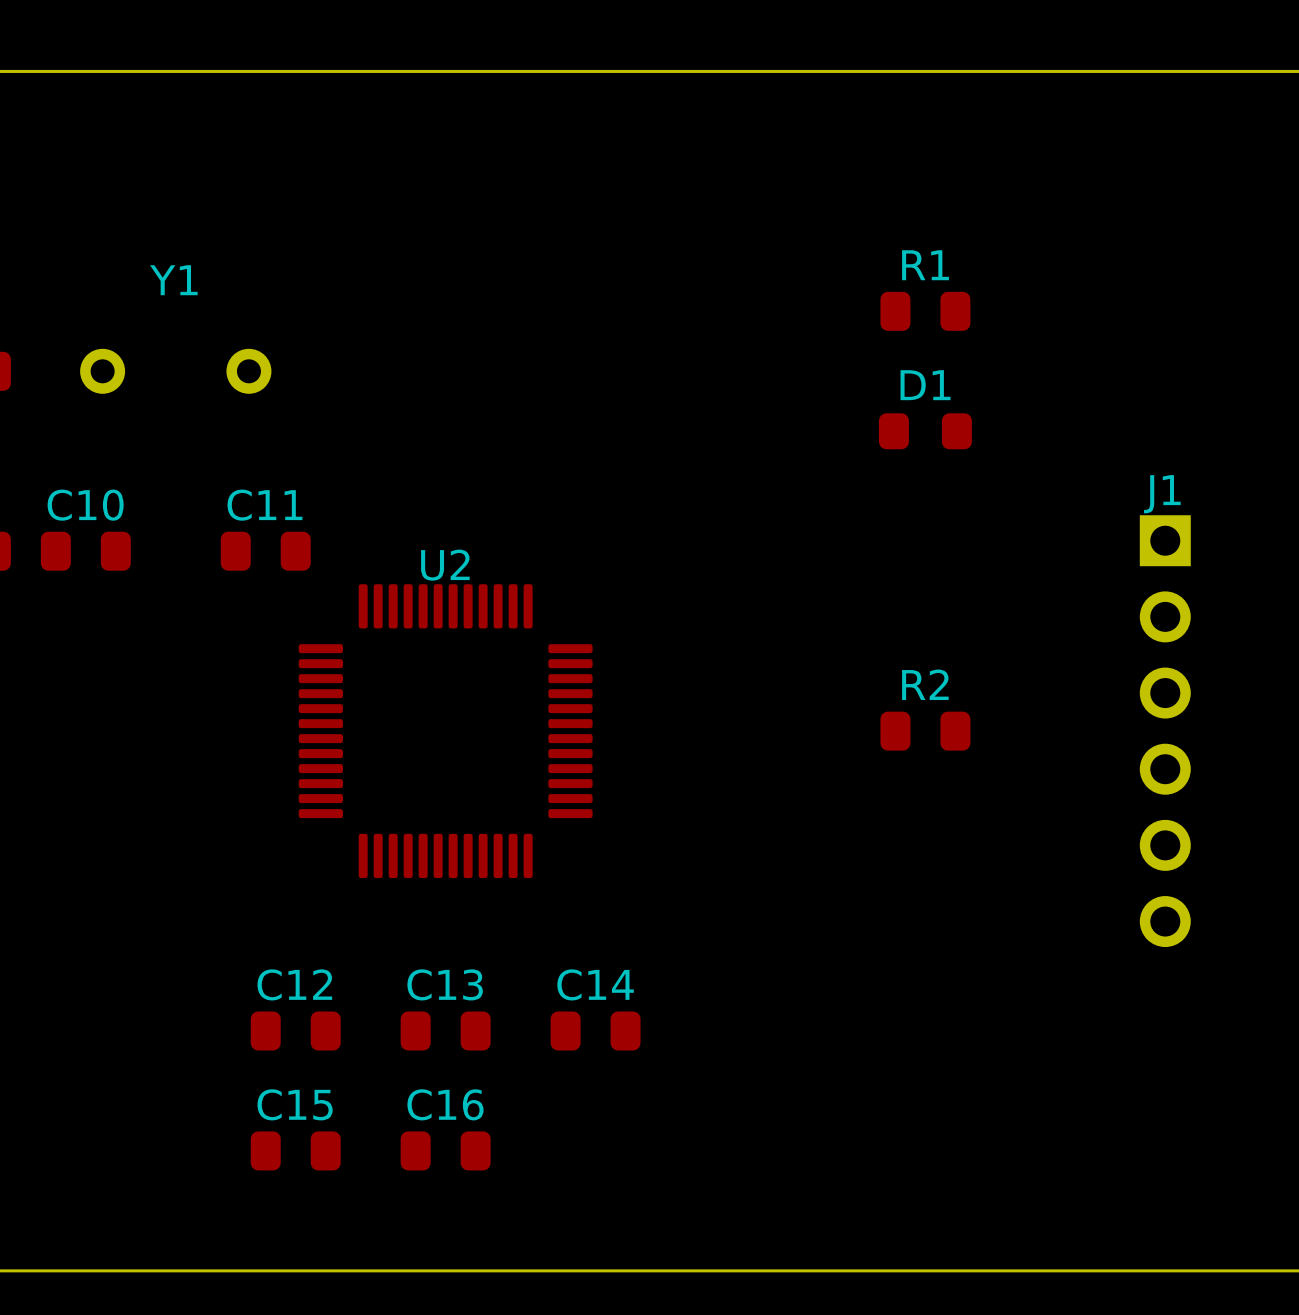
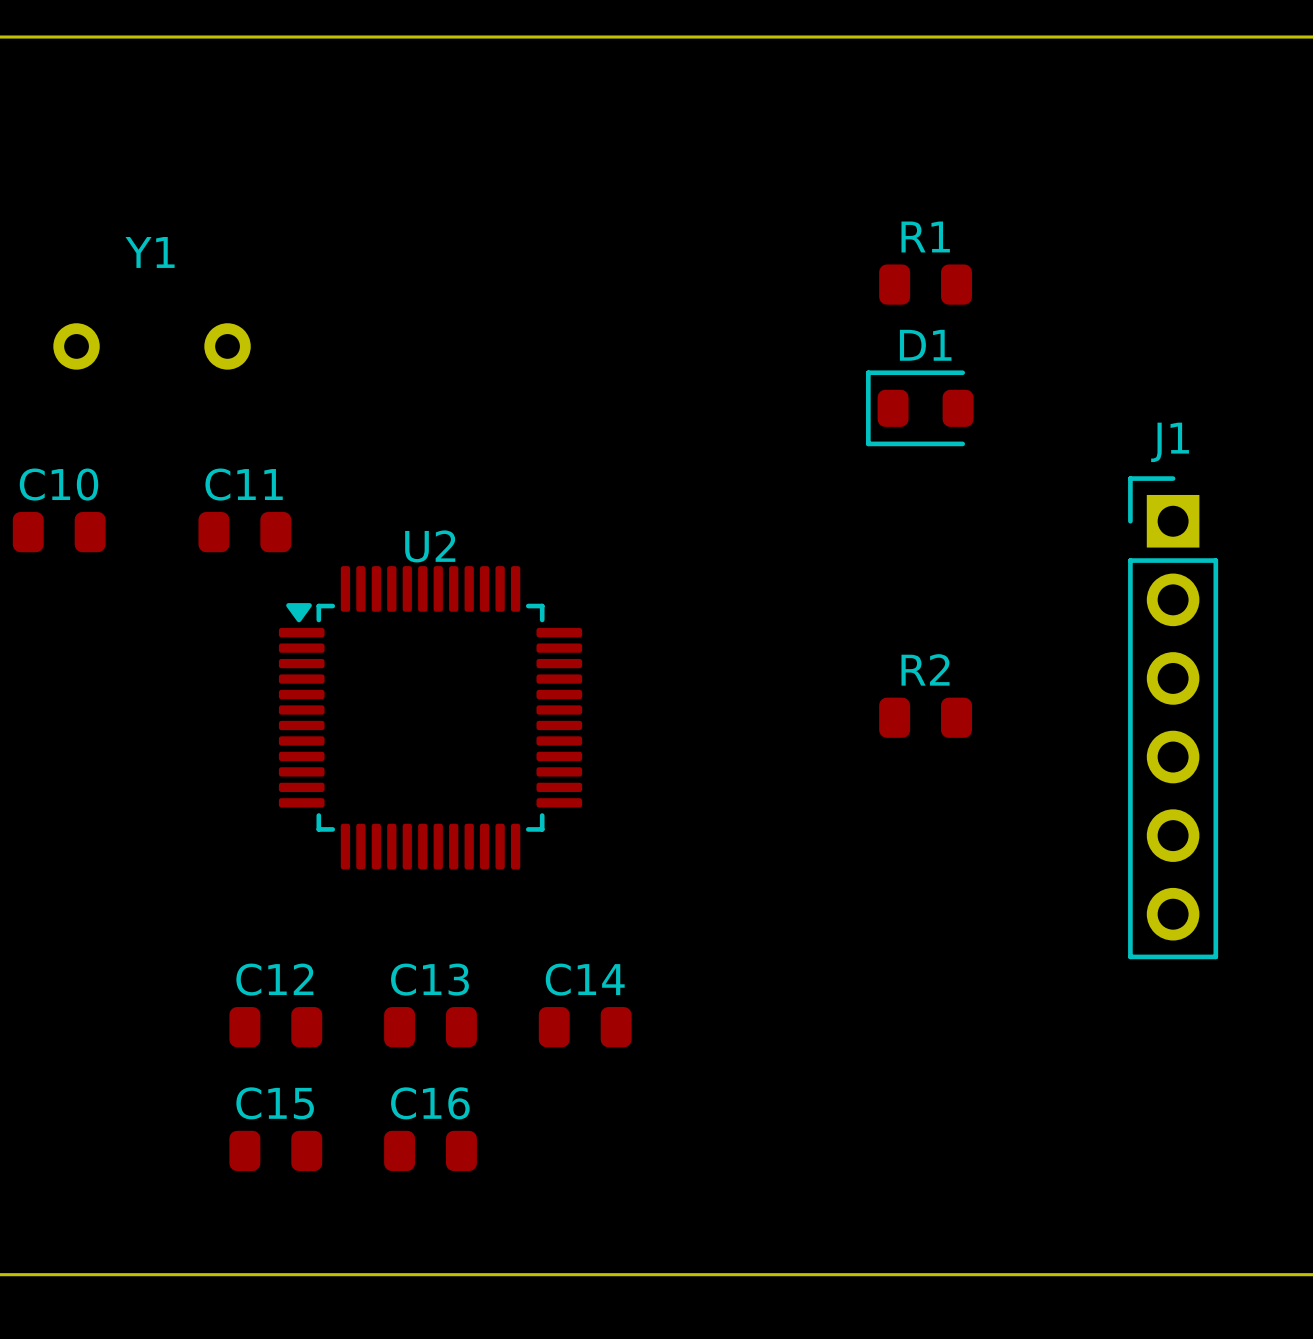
D1 footprint: [878, 413, 972, 450] -> [866, 370, 974, 447]
J1 footprint: [1139, 515, 1191, 948] -> [1128, 476, 1219, 960]
U2 footprint: [298, 584, 593, 879] -> [278, 566, 583, 870]

